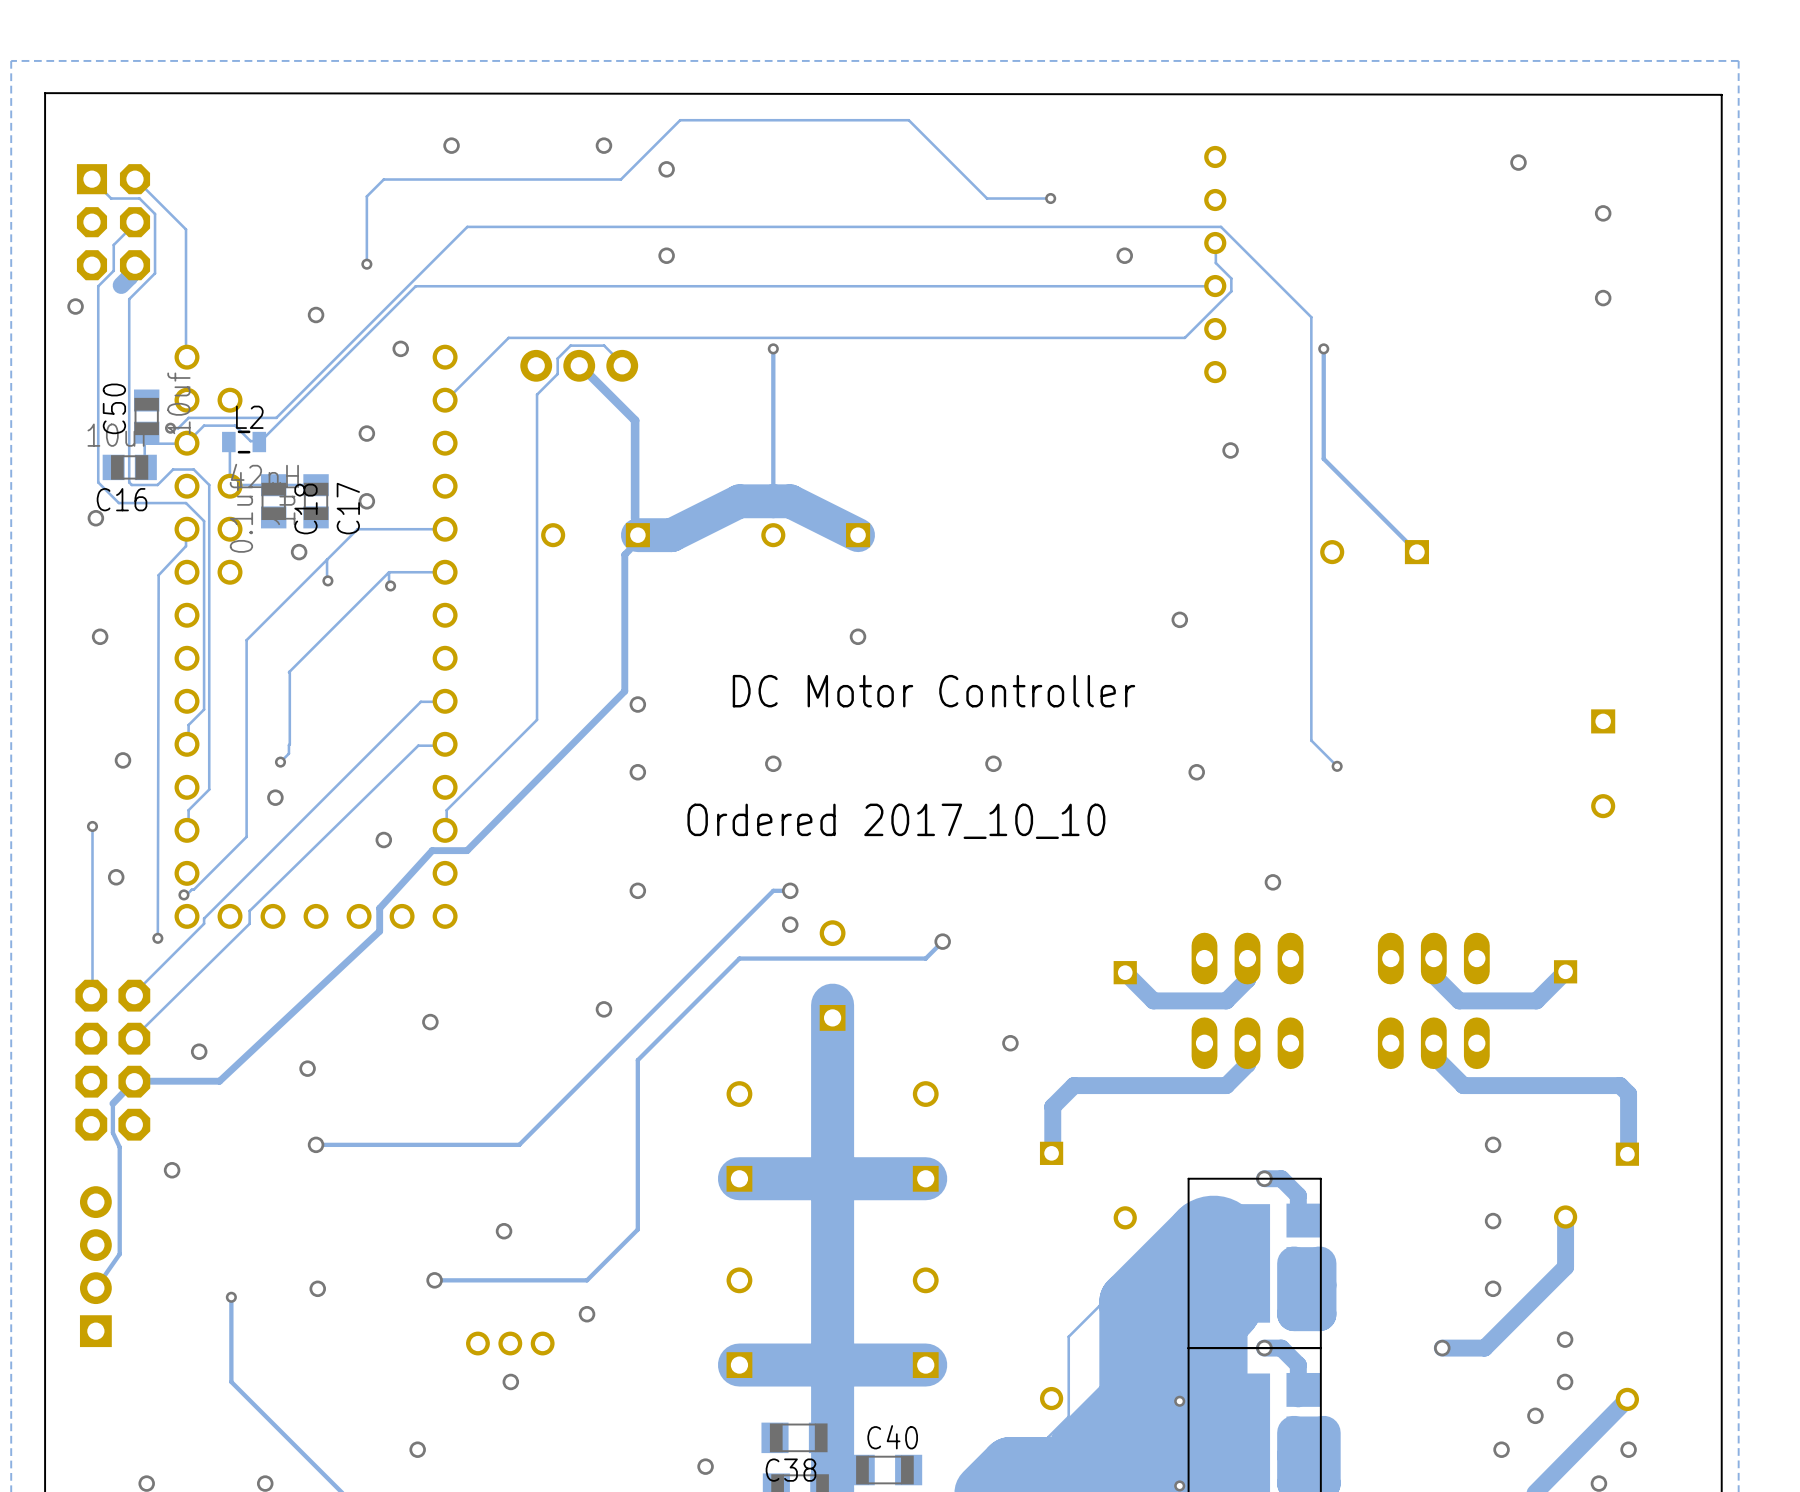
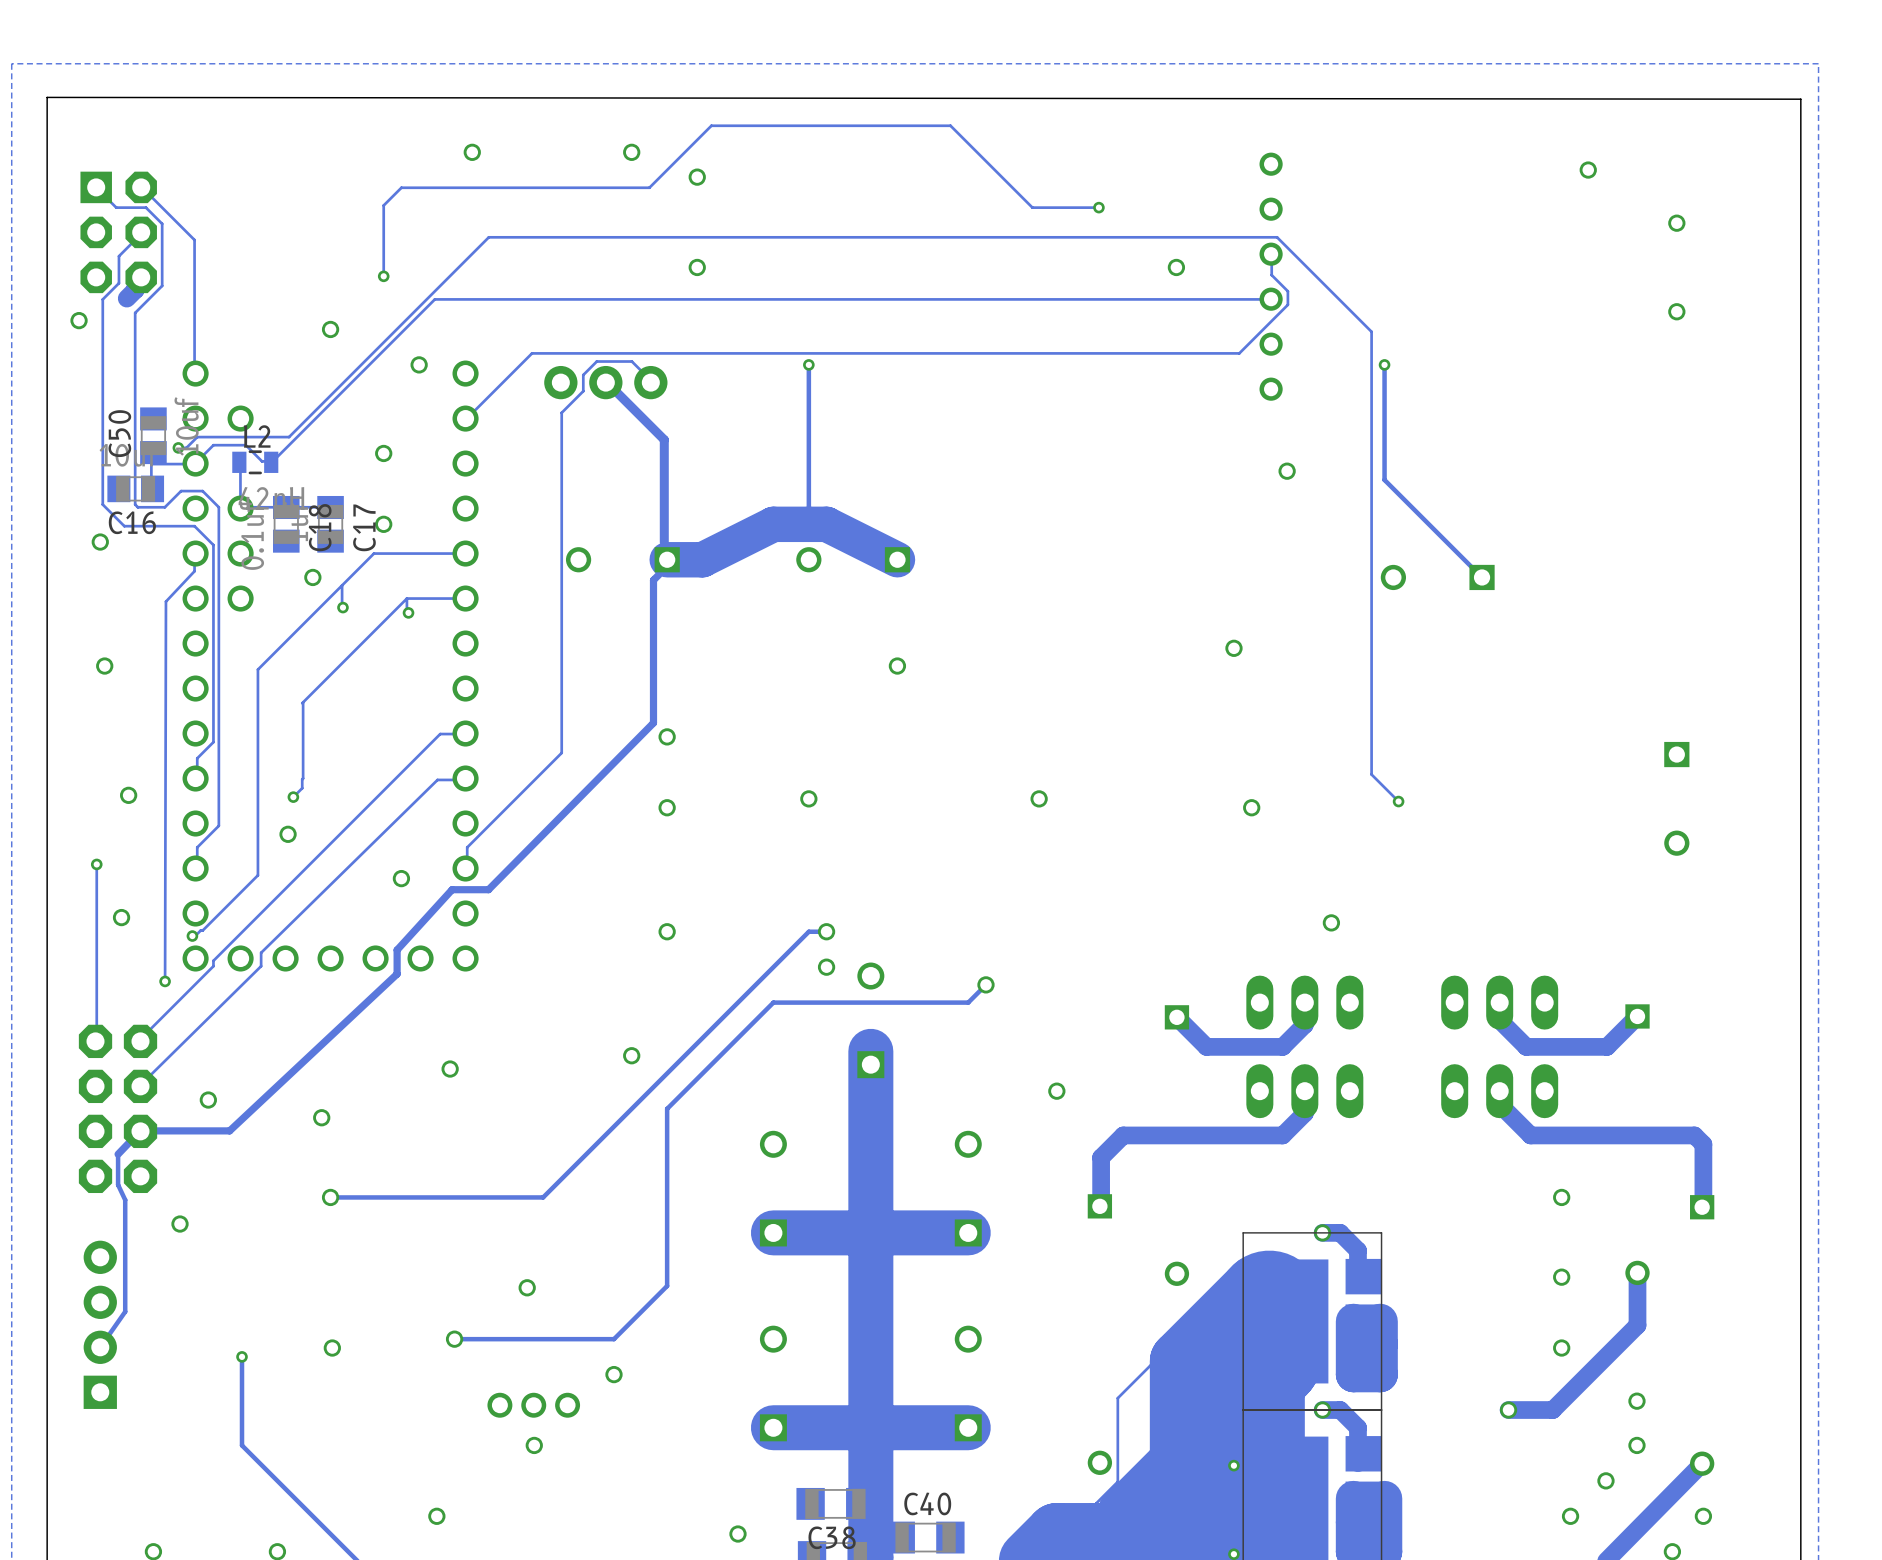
text: DC Motor Controller (933, 691) -> none
text: Ordered 2017_10_10 (896, 821) -> none

